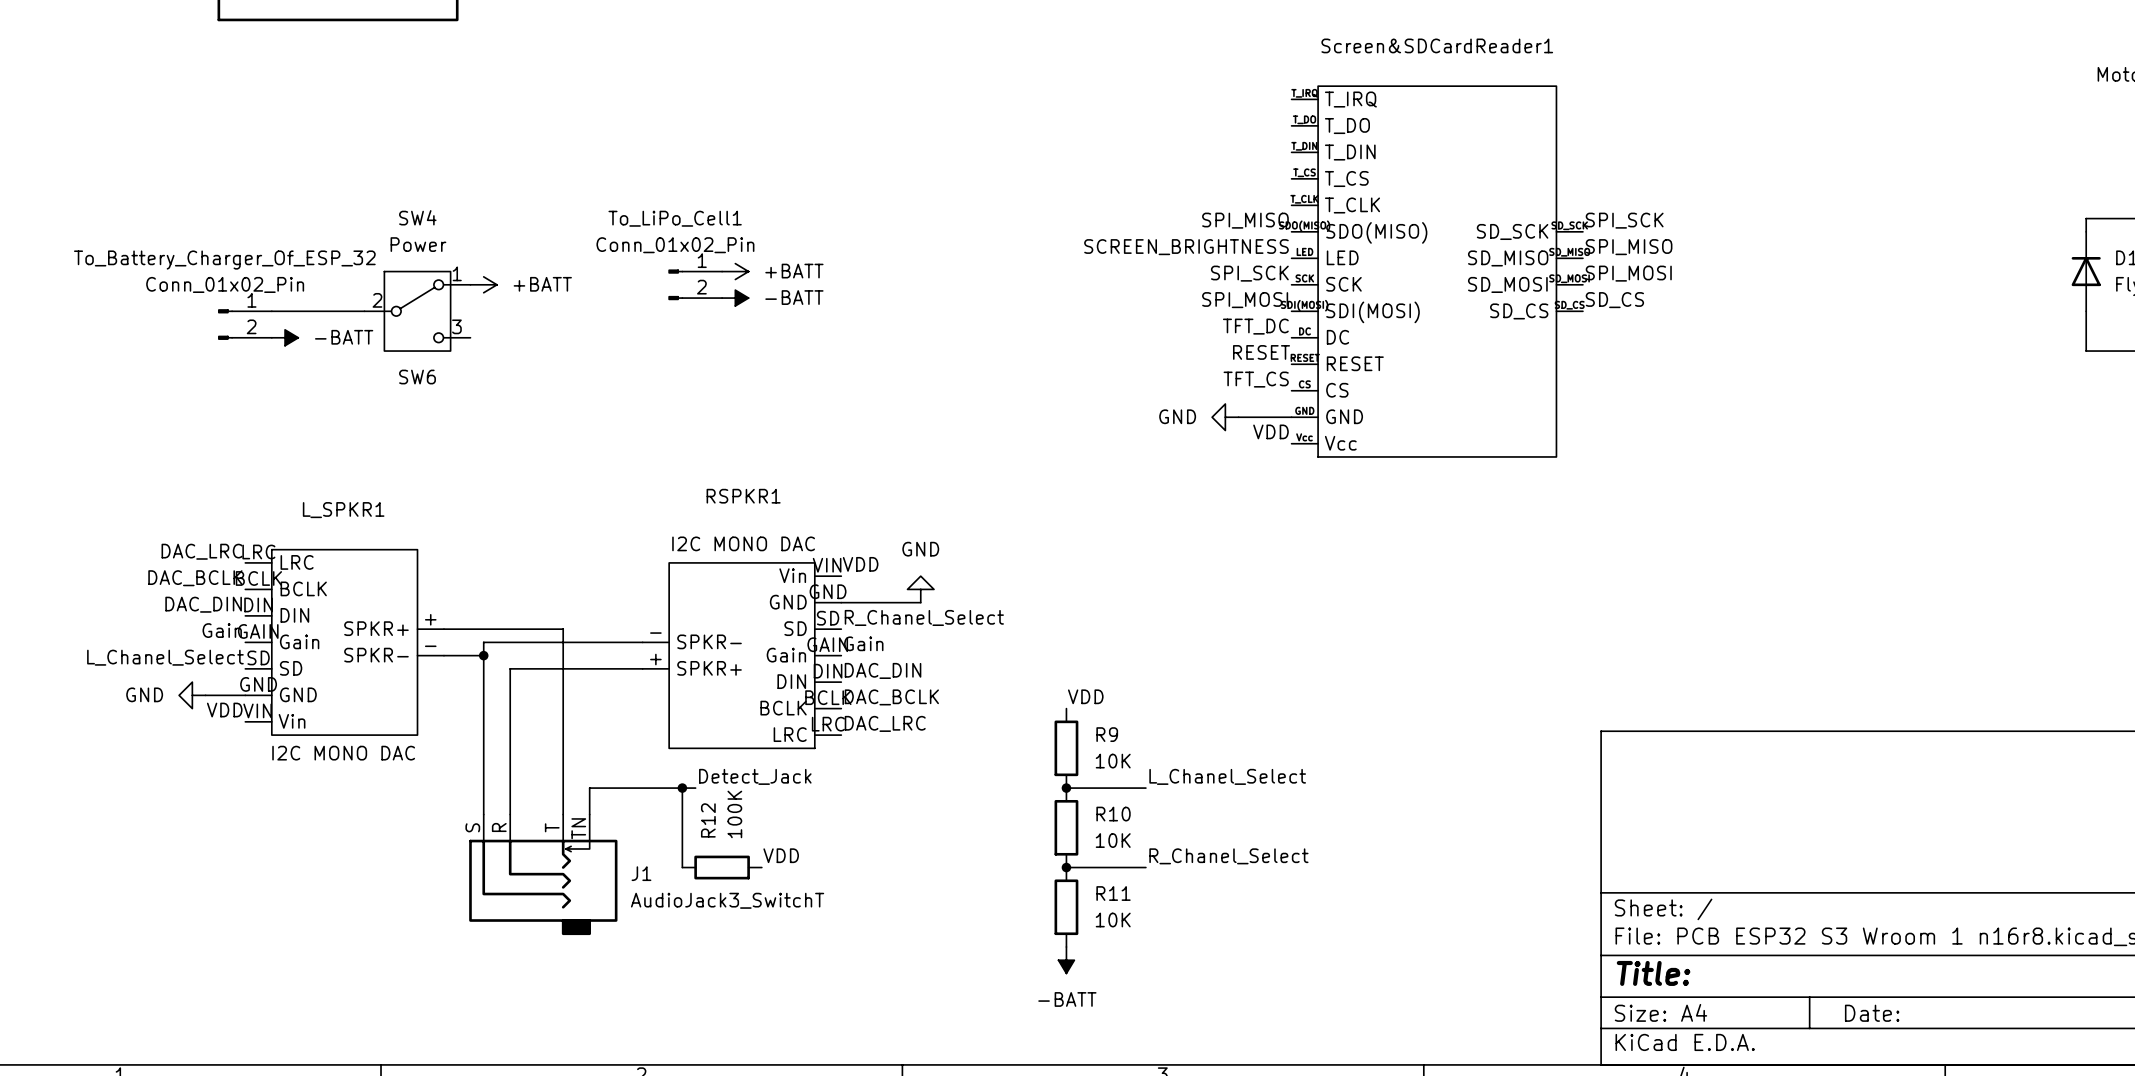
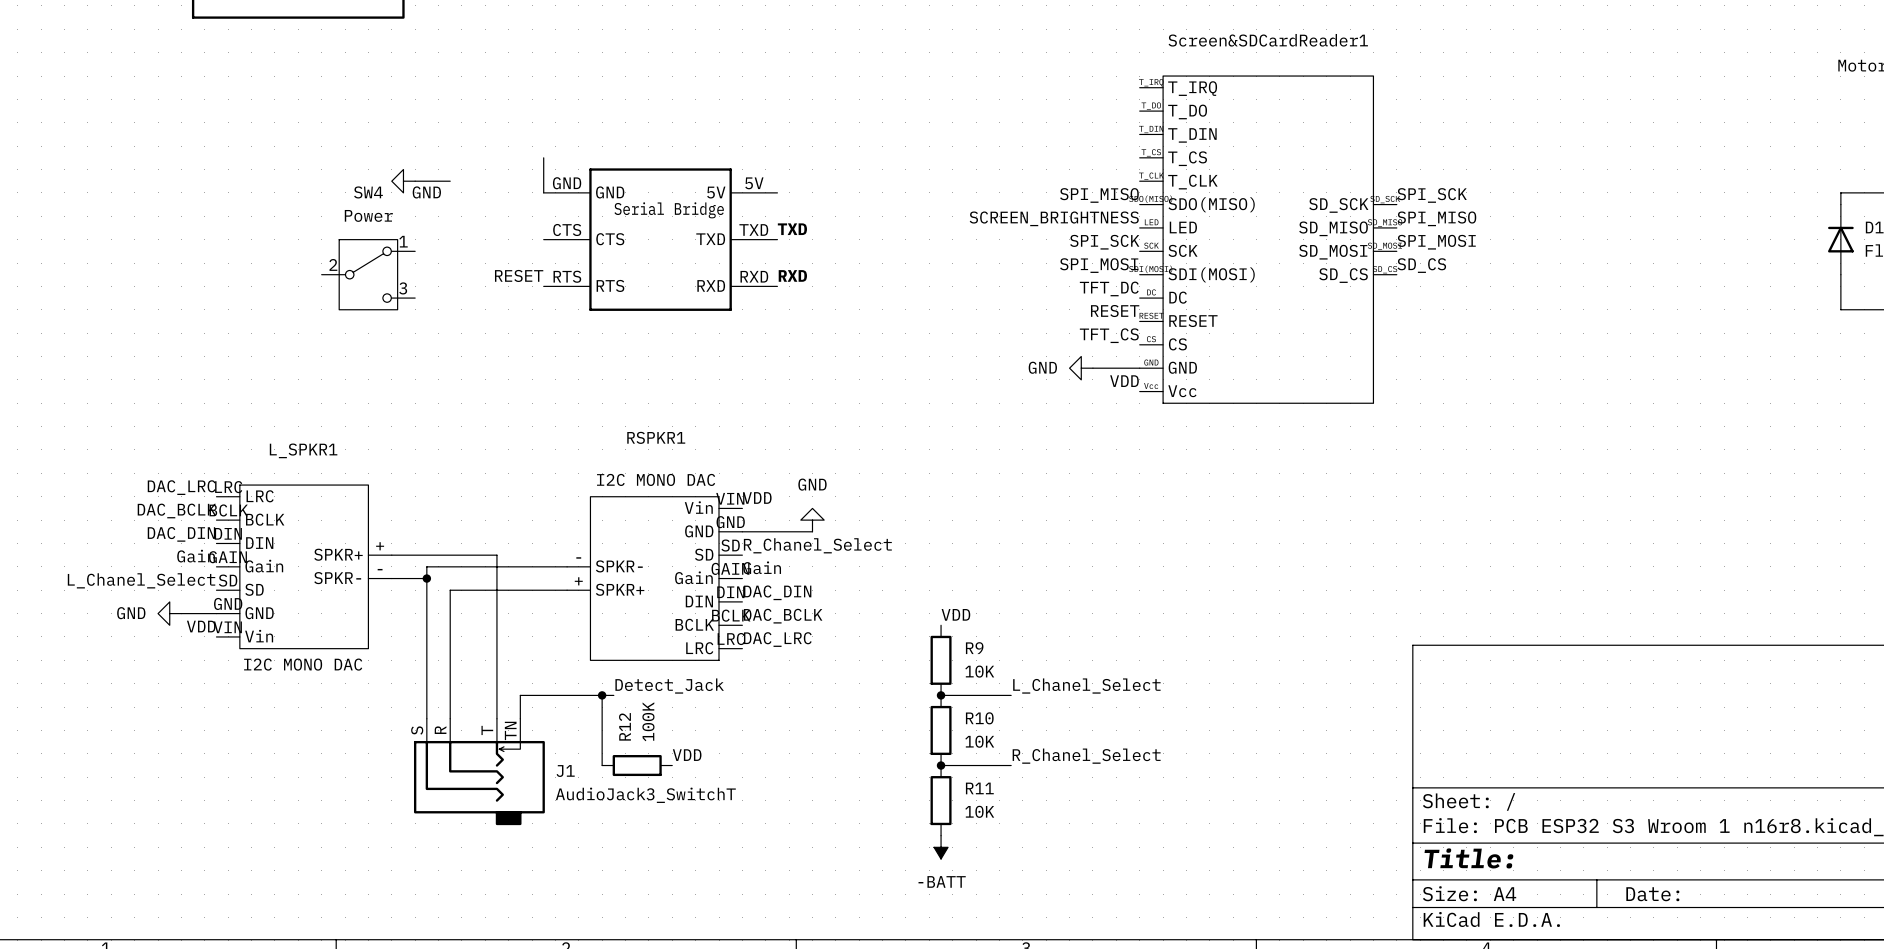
wire: none -> (543, 157) (543, 192)
power symbol: none -> GND (403, 181)
wire: none -> (415, 181) (450, 181)
label: none -> TXD (792, 229)
power symbol: +BATT (735, 271) -> none
part: none -> (660, 239)
power symbol: +BATT (483, 284) -> none
To_LiPo_Cell1: Conn_01x02_Pin (695, 284) -> none
power symbol: -BATT (735, 298) -> none
wire: (271, 311) (364, 311) -> none
label: none -> RESET (519, 275)
label: none -> RXD (792, 275)
To_Battery_Charger_Of_ESP_32: Conn_01x02_Pin (244, 324) -> none
power symbol: -BATT (285, 337) -> none
SW6 name: SW6 (417, 377) -> none

